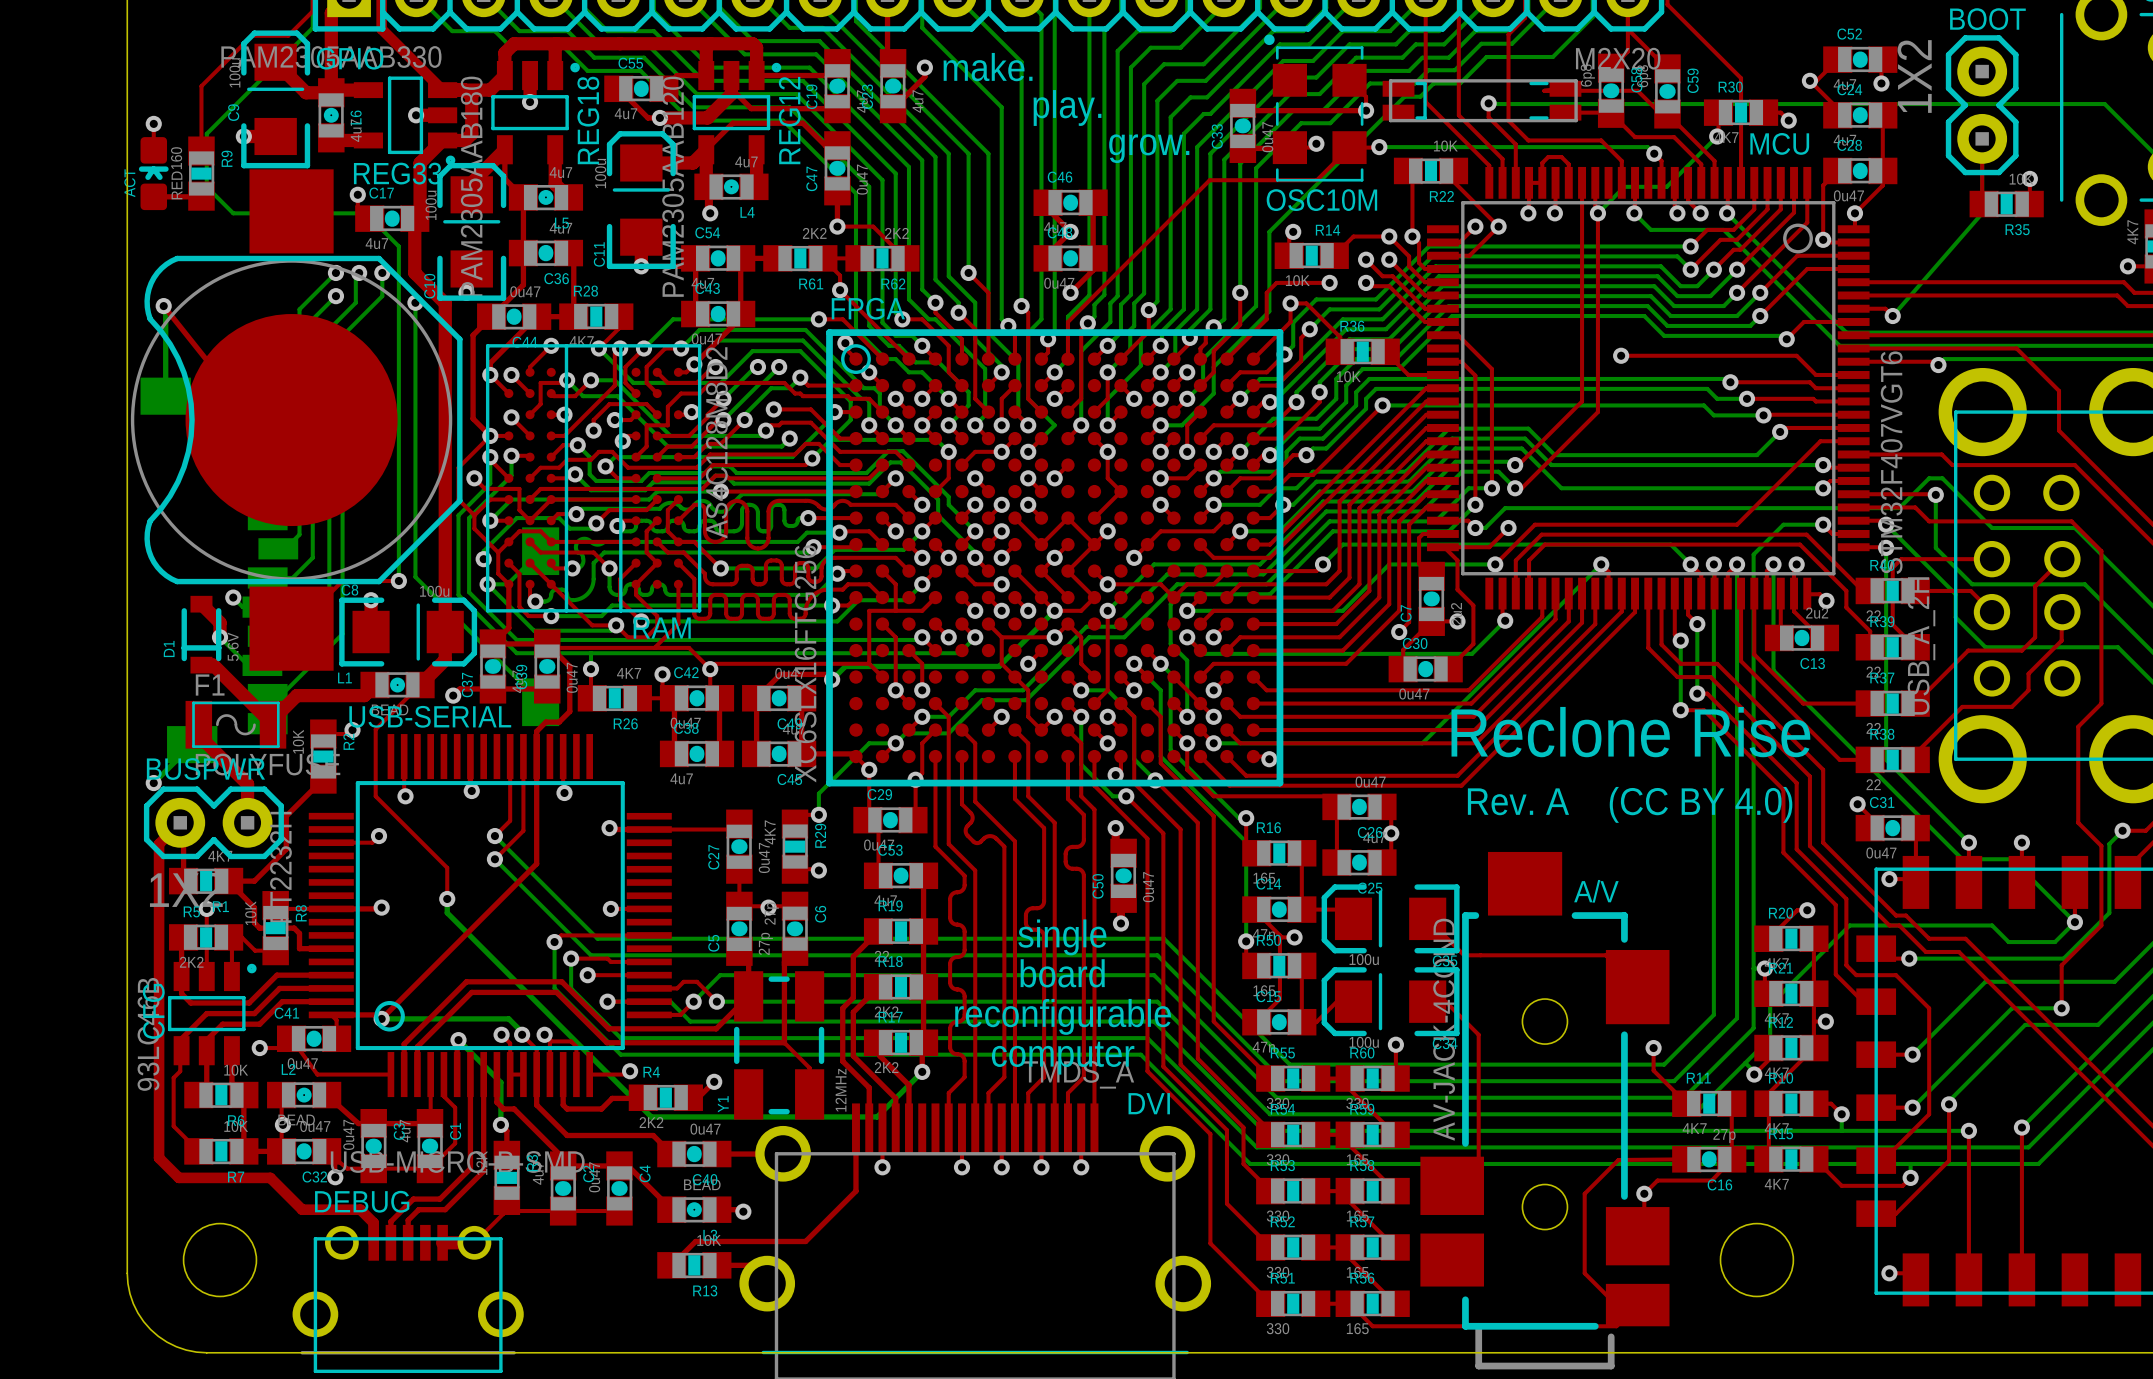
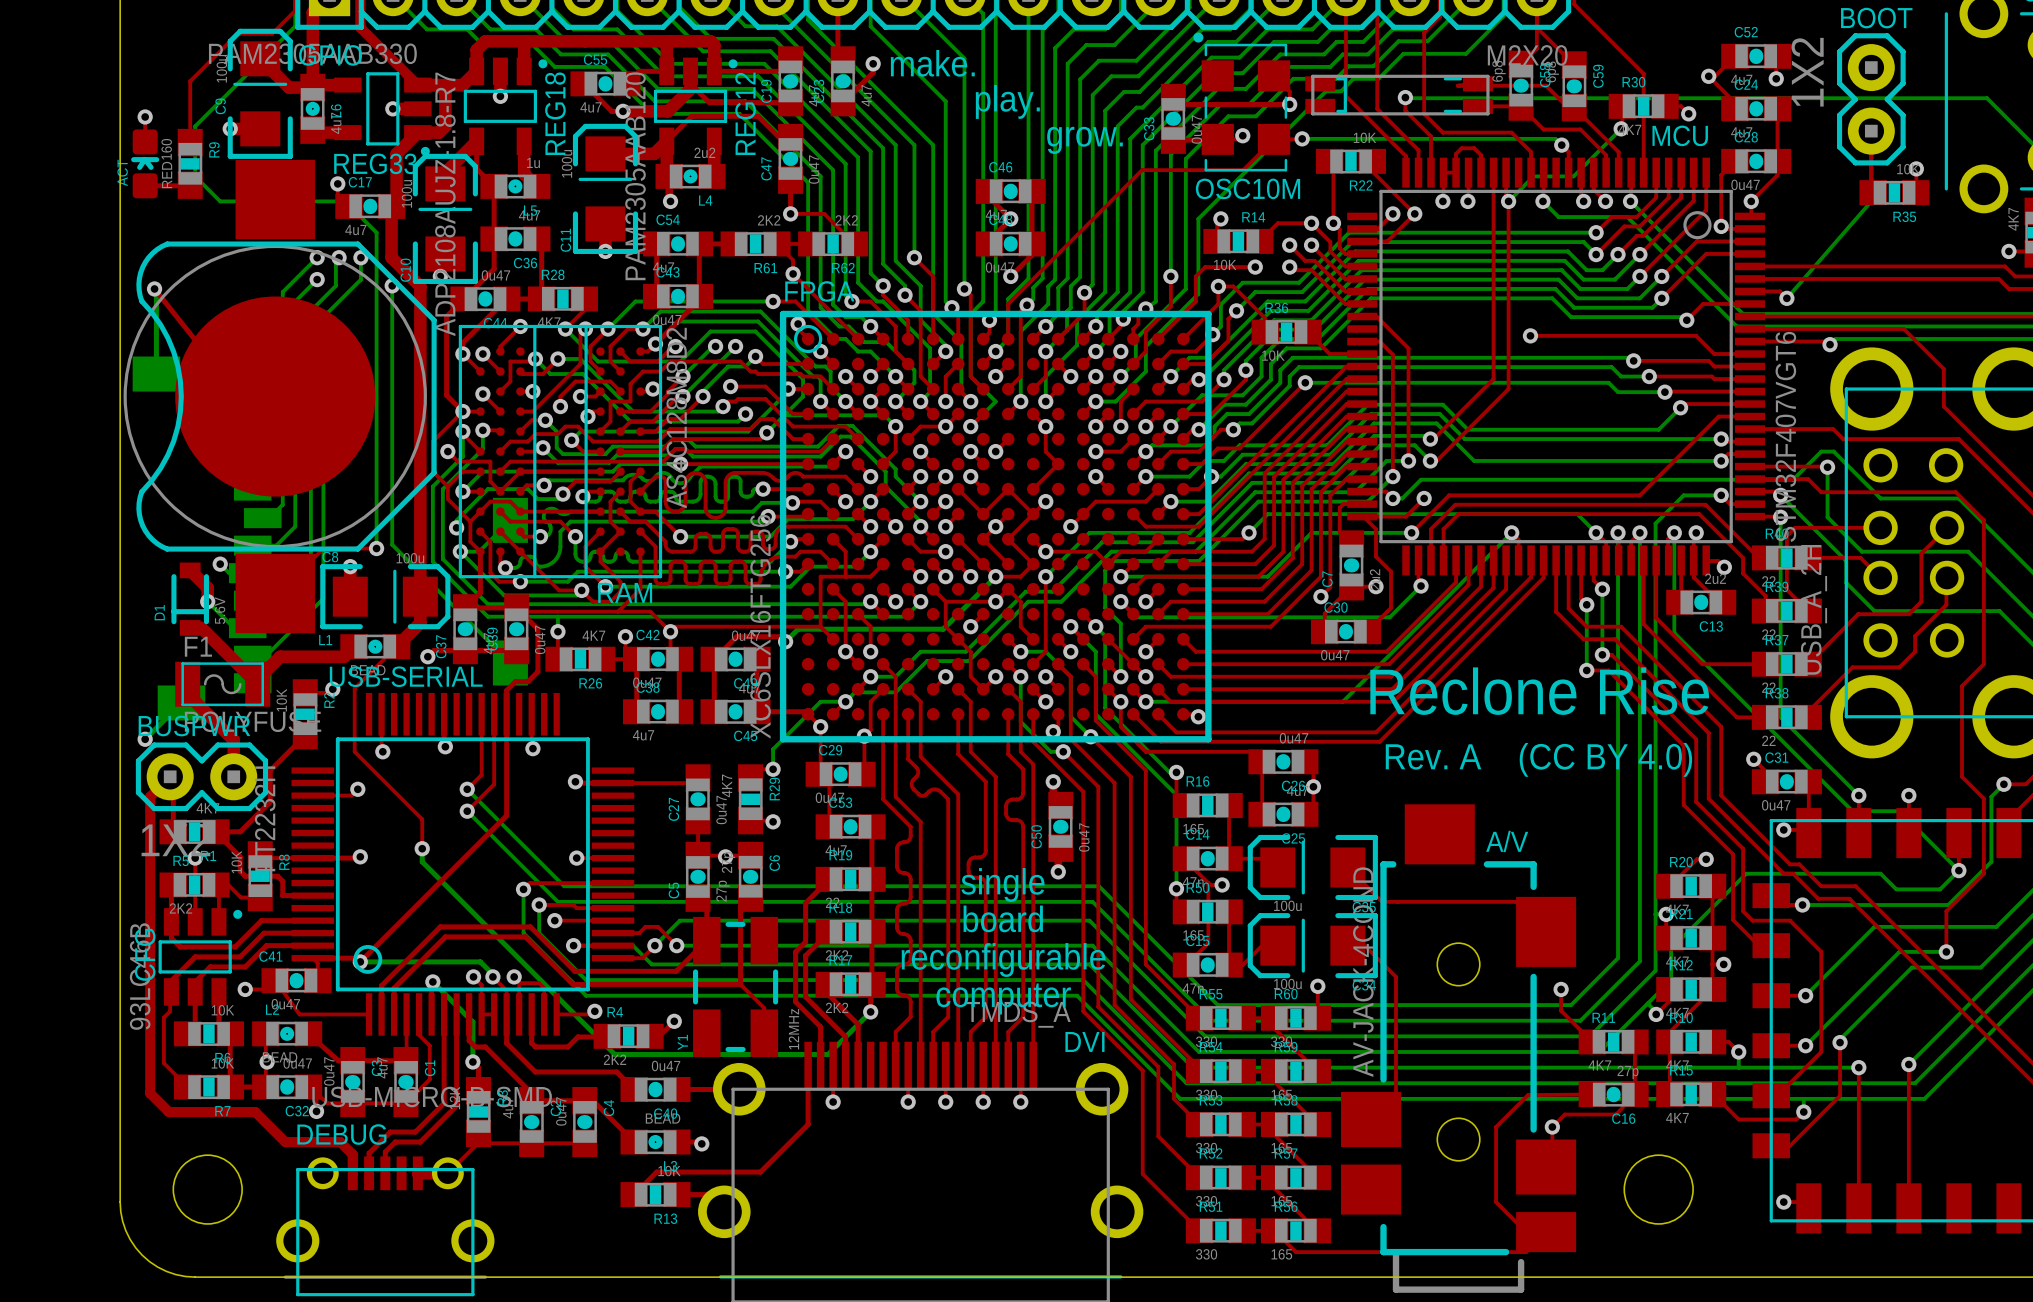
L4 value: 4u7 (746, 162) -> 2u2 (704, 152)
L5 value: 4u7 (560, 172) -> 1u (533, 162)
REG18 value: PAM2305AAB180 (471, 186) -> ADP2108AUJZ-1.8-R7 (445, 204)

